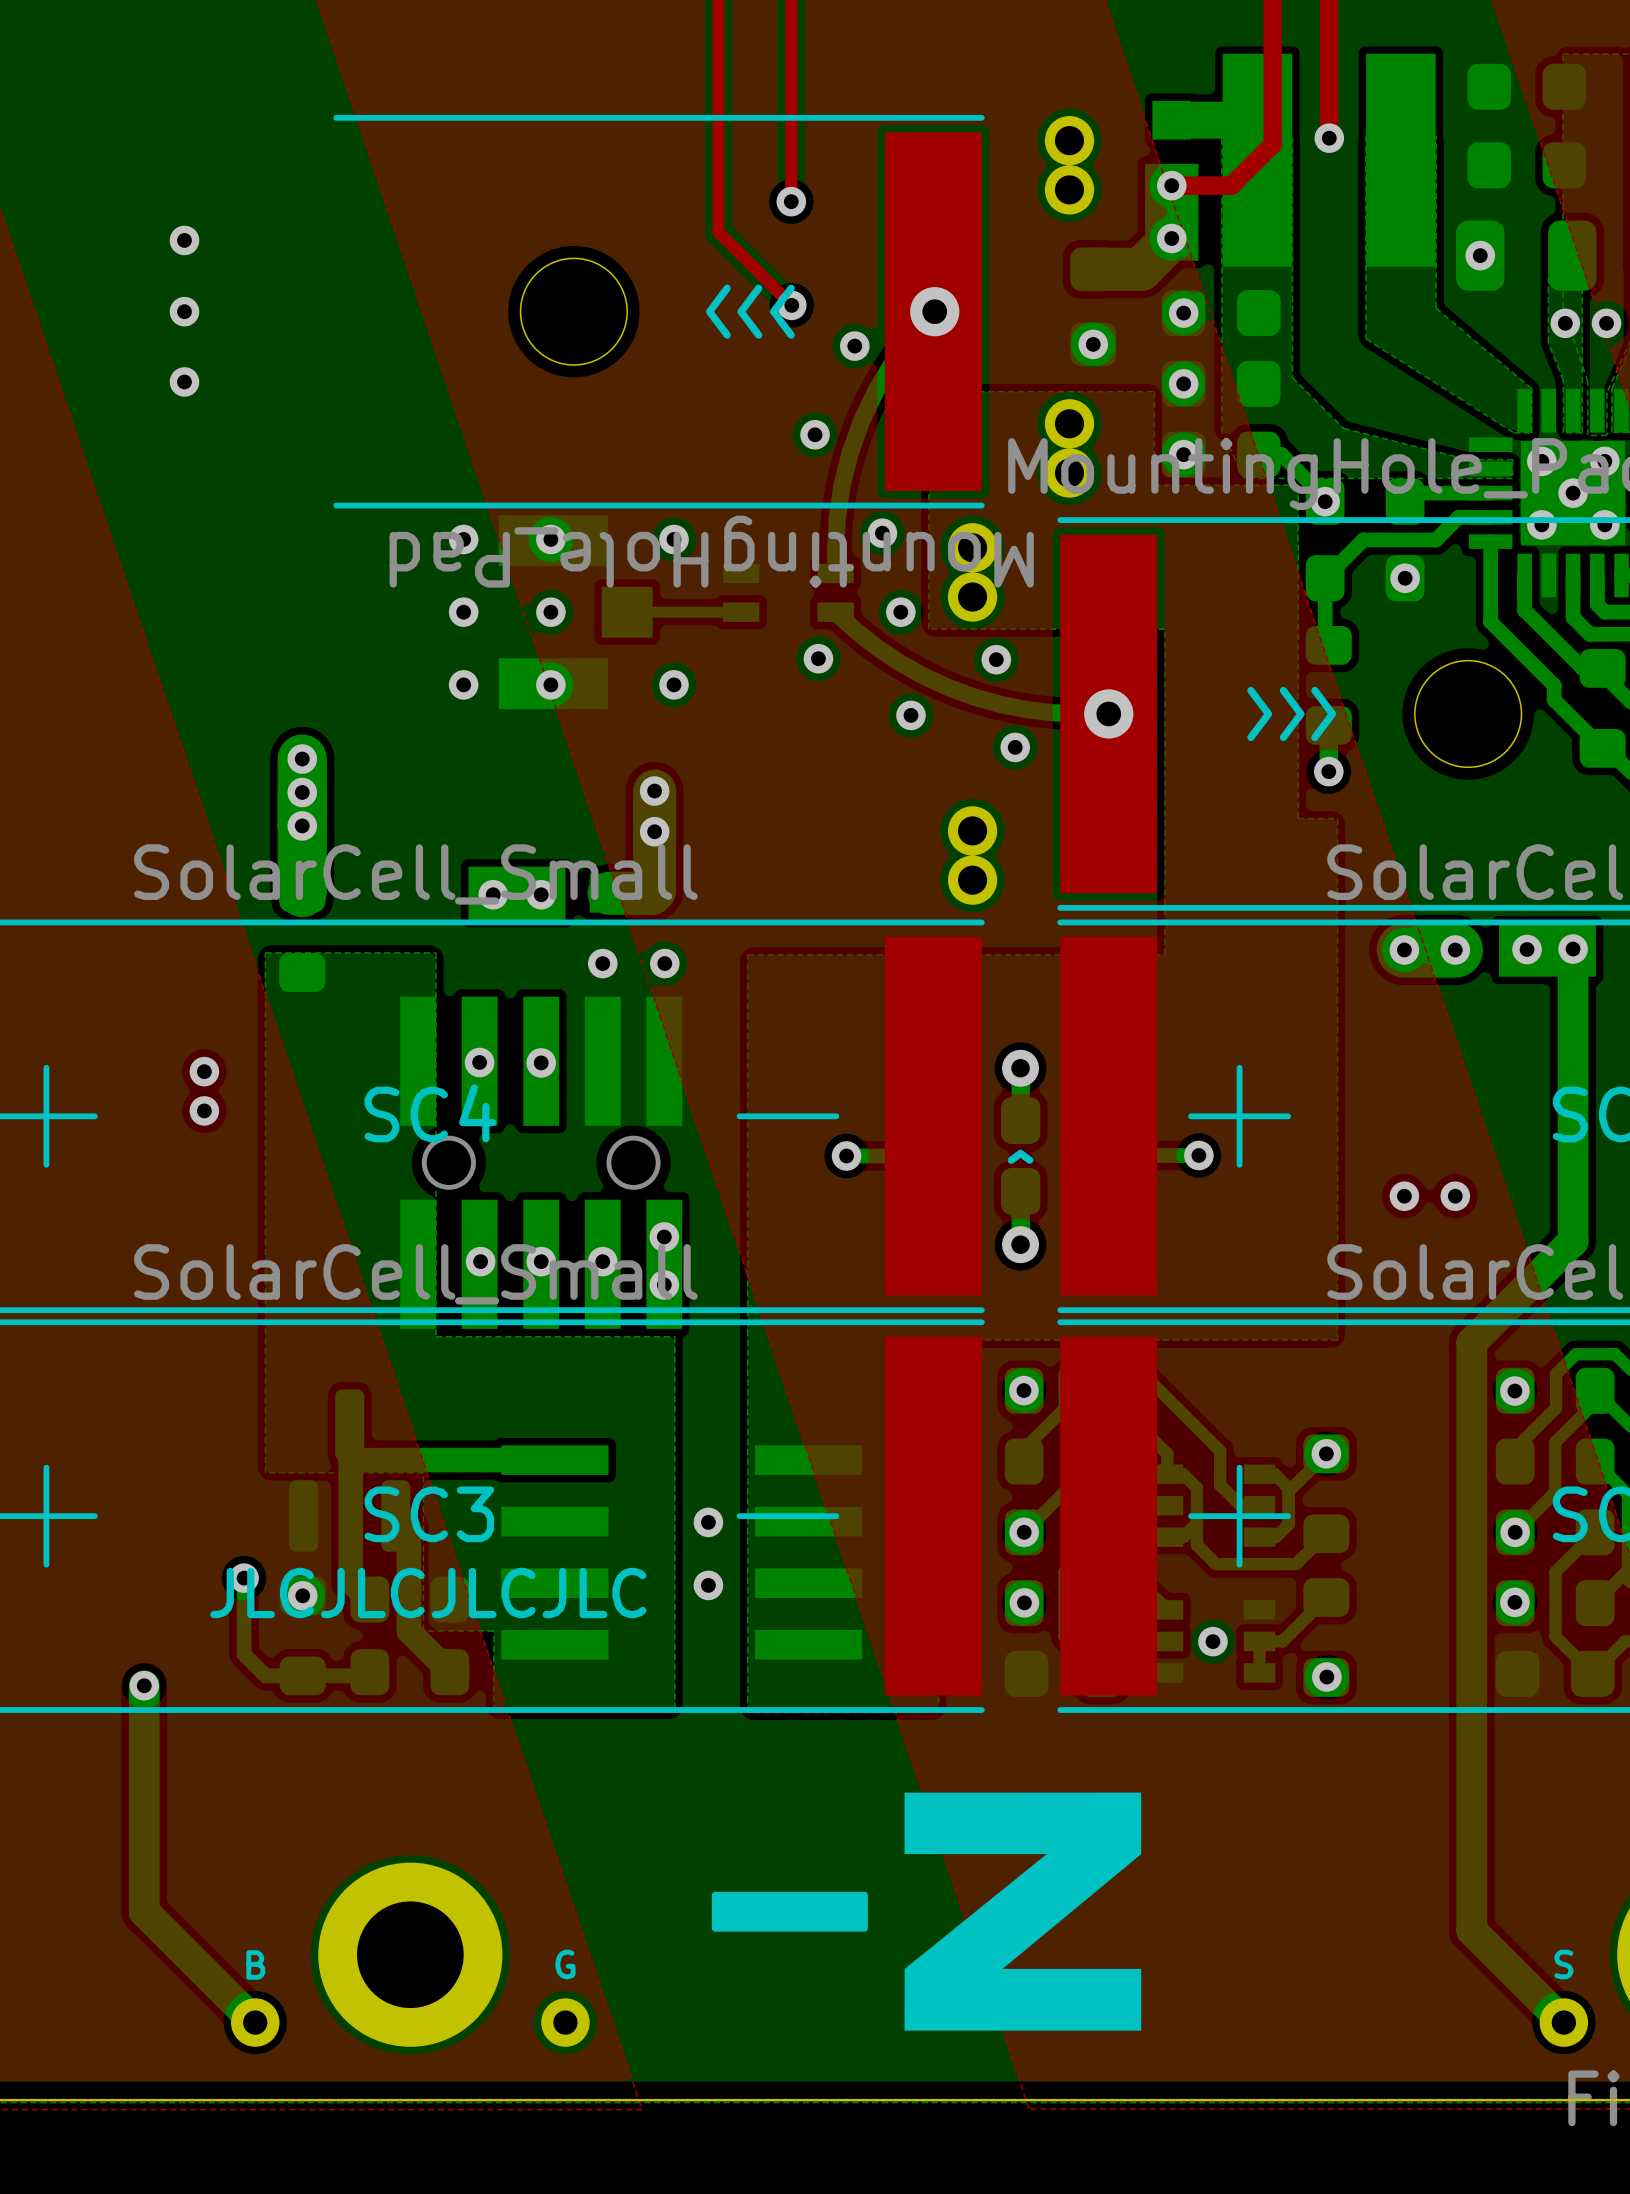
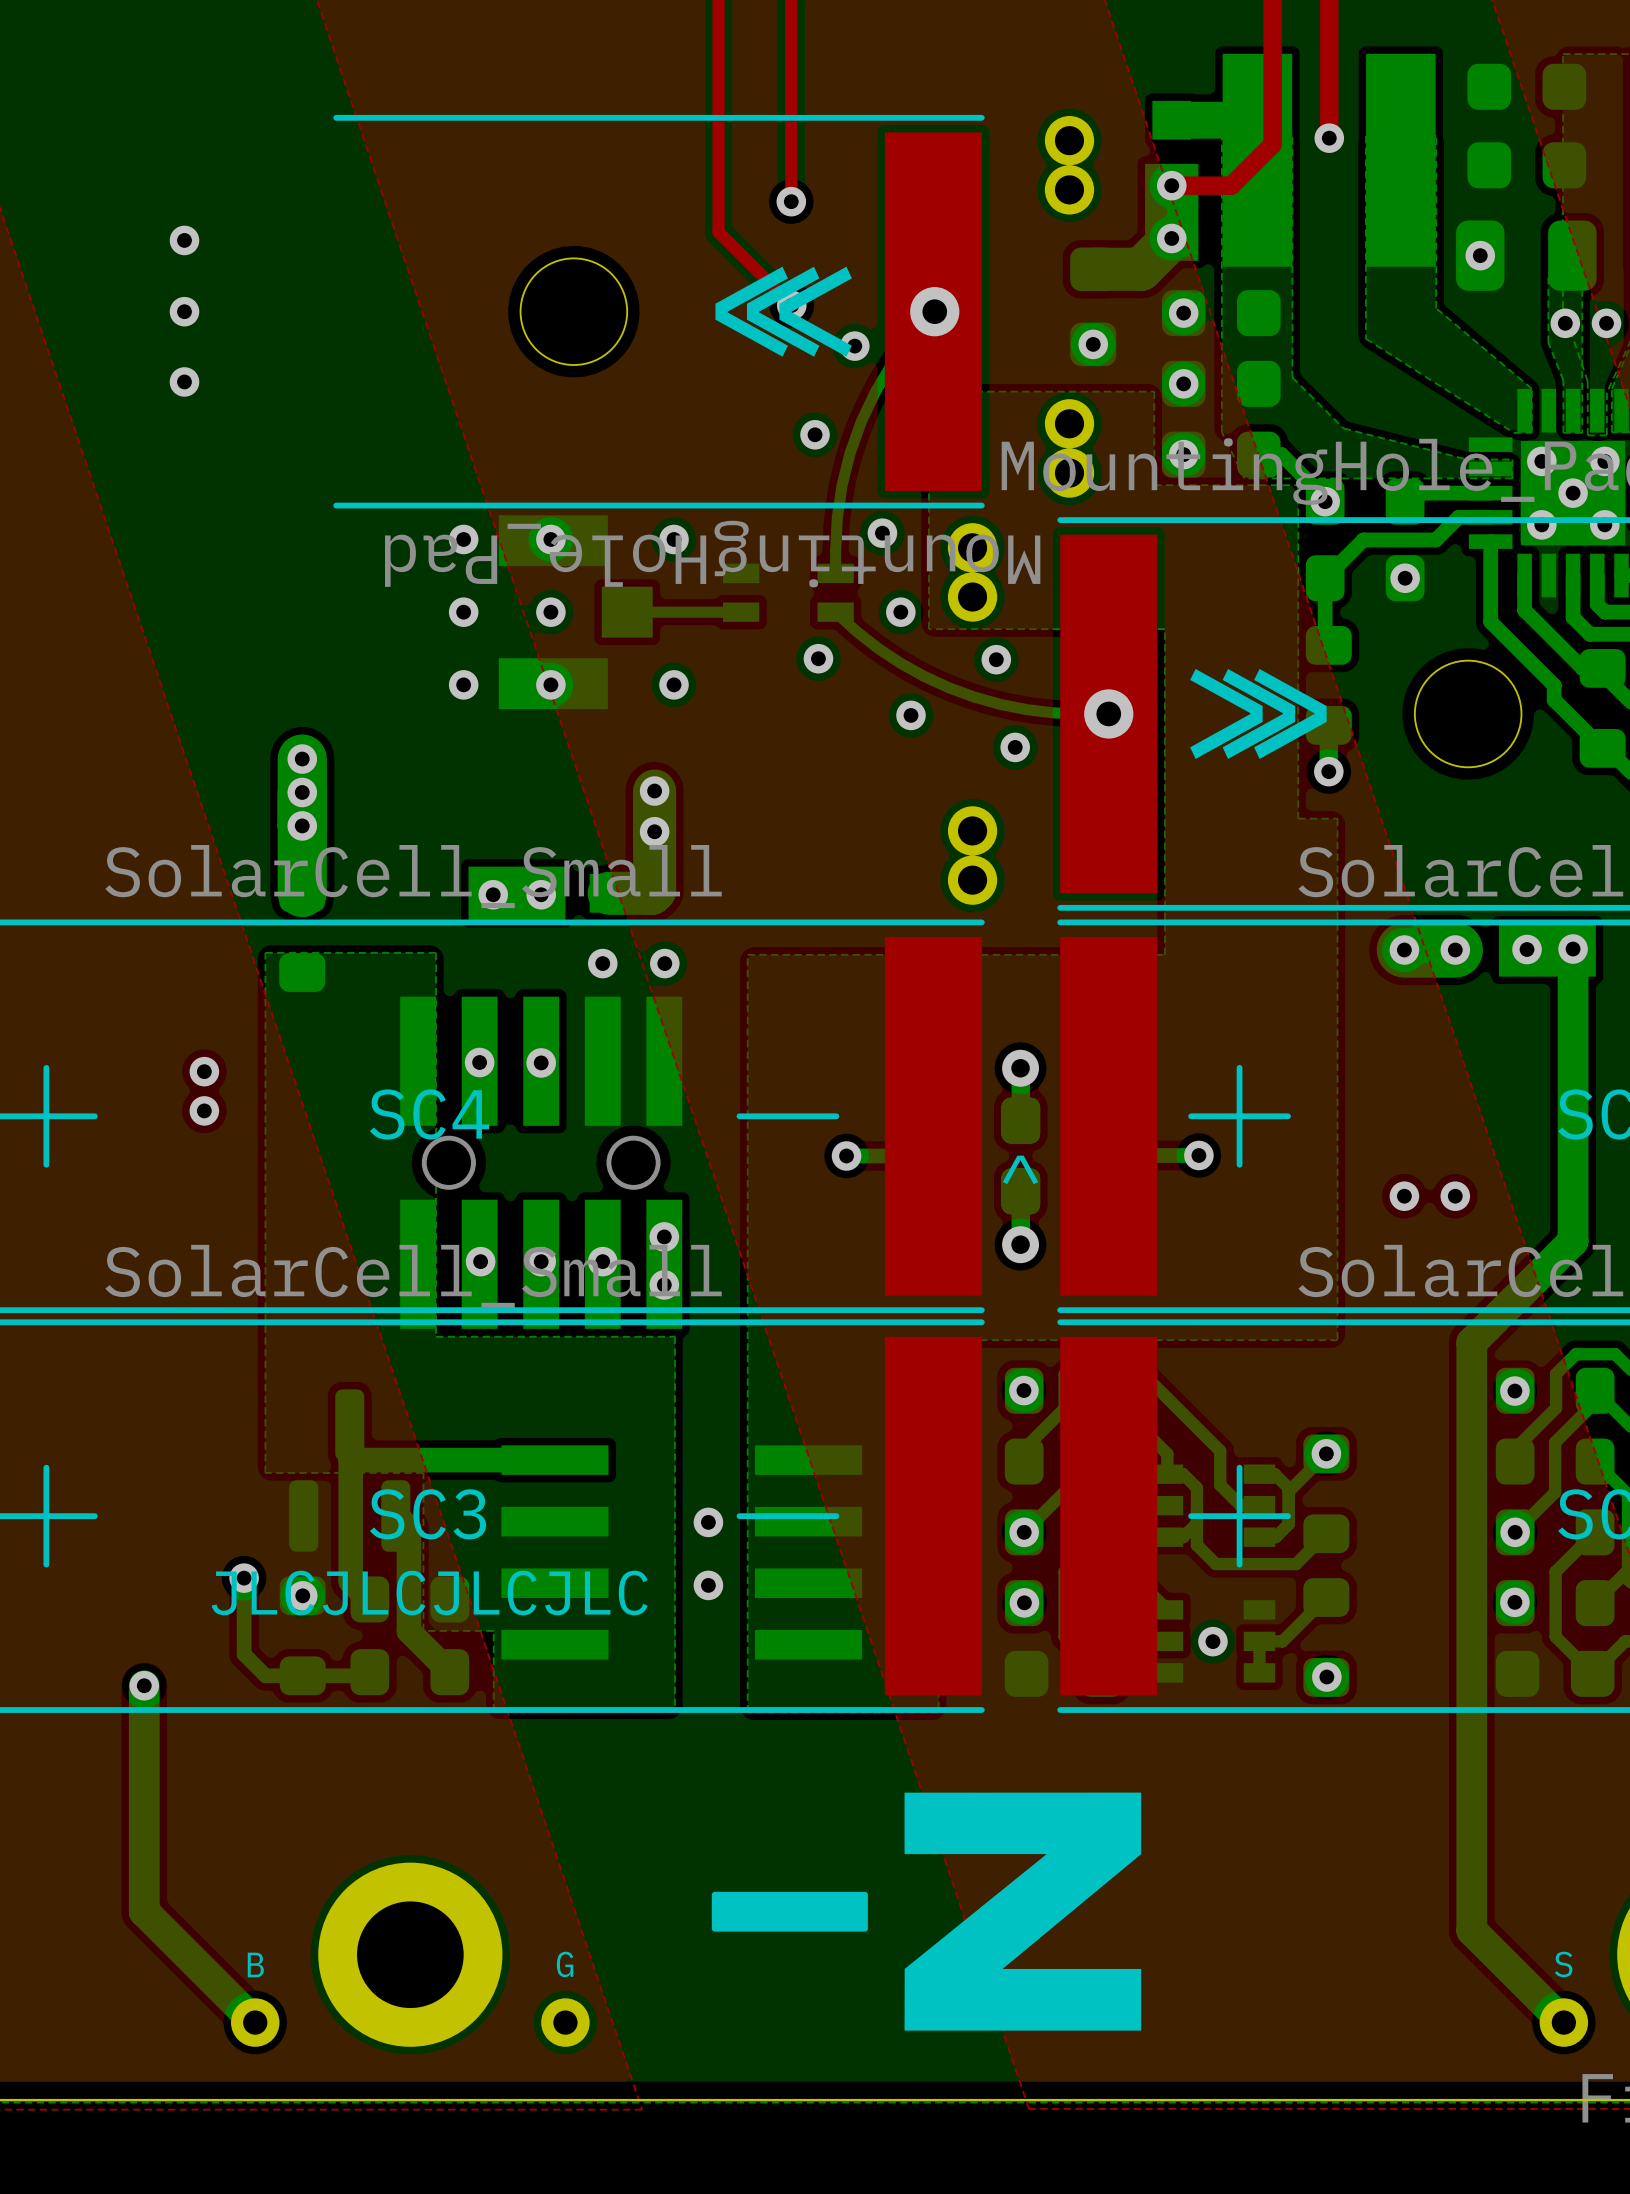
bottom track width: thick (934, 311) (912, 336) (892, 362) (875, 391) (861, 421) (850, 452) (842, 484) (837, 517) (835, 573) -> thin (934, 311) (912, 336) (892, 362) (875, 391) (861, 421) (850, 452) (842, 484) (837, 517) (835, 573)
bottom track width: thick (835, 612) (877, 647) (899, 662) (948, 687) (973, 696) (1027, 709) (1054, 712) (1108, 713) -> thin (835, 612) (877, 647) (899, 662) (948, 687) (973, 696) (1027, 709) (1054, 712) (1108, 713)

